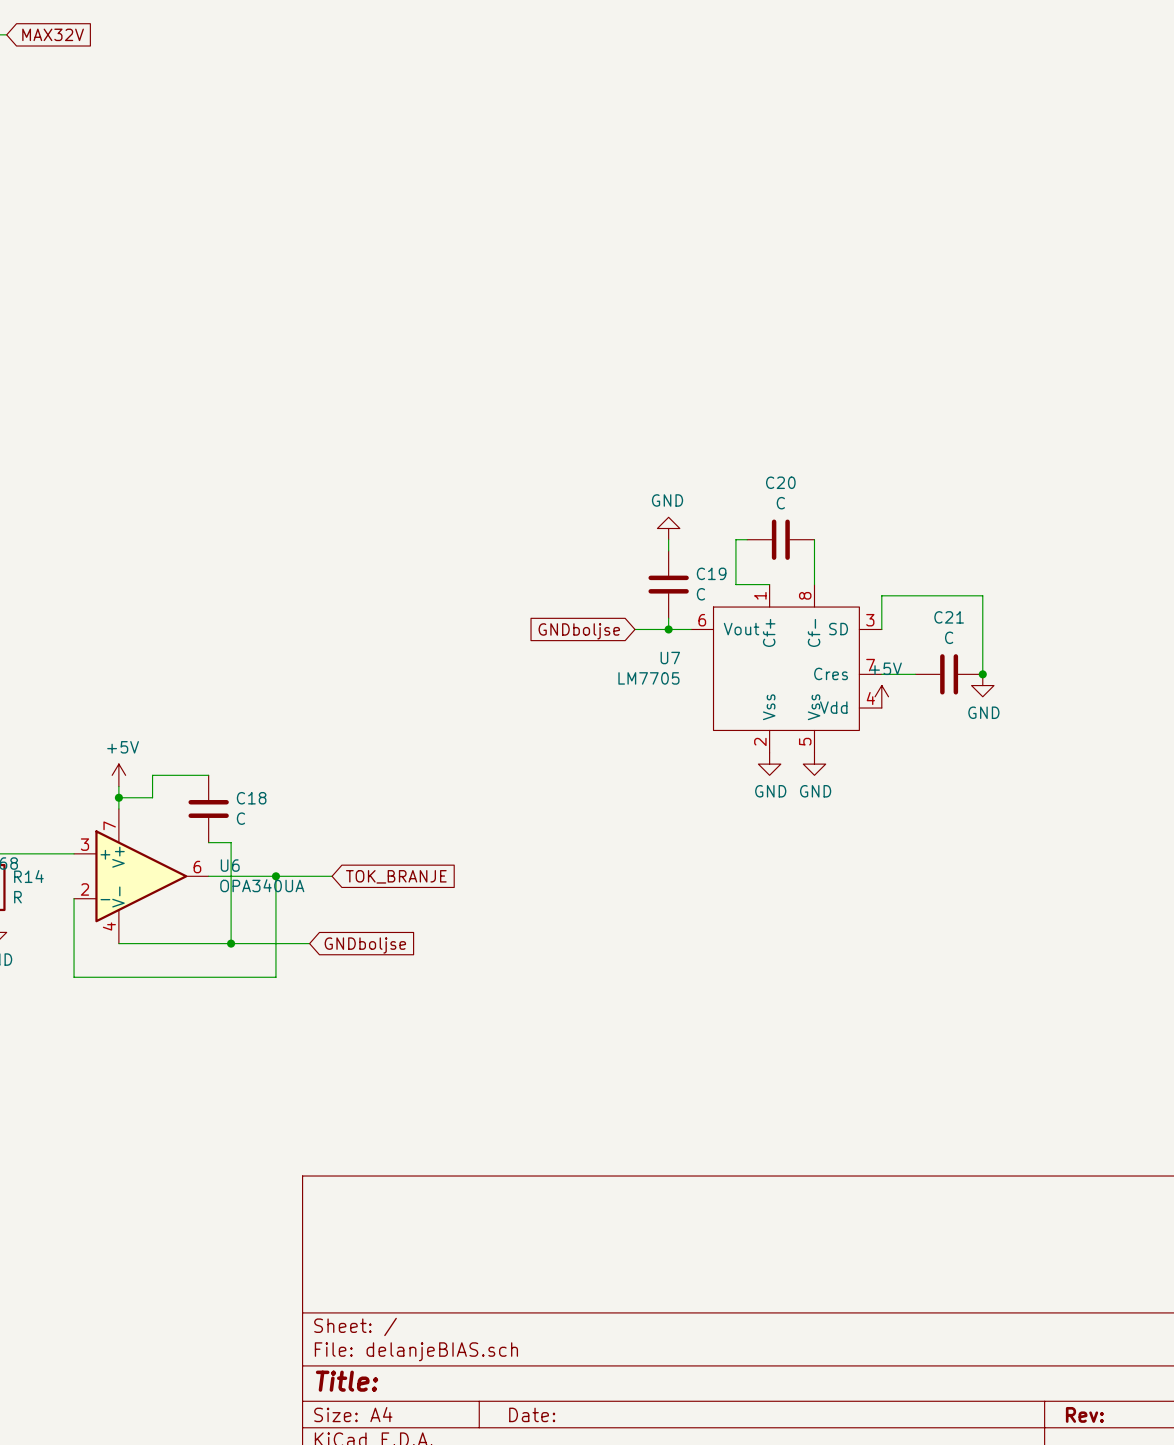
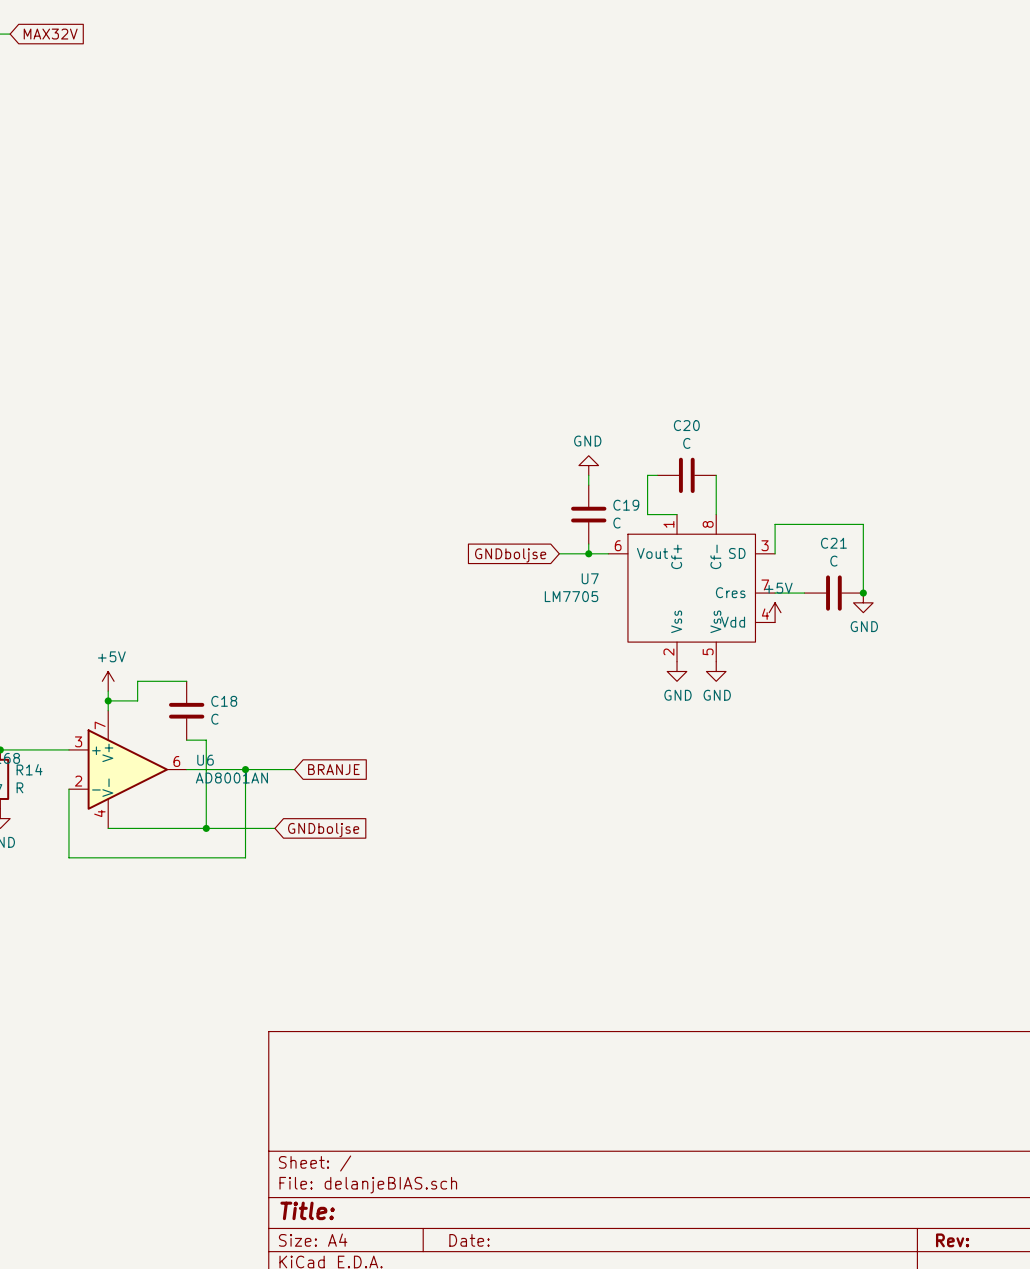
global label: TOK_BRANJE (396, 876) -> BRANJE (333, 769)
U6 value: OPA340UA (262, 885) -> AD8001AN (231, 778)

